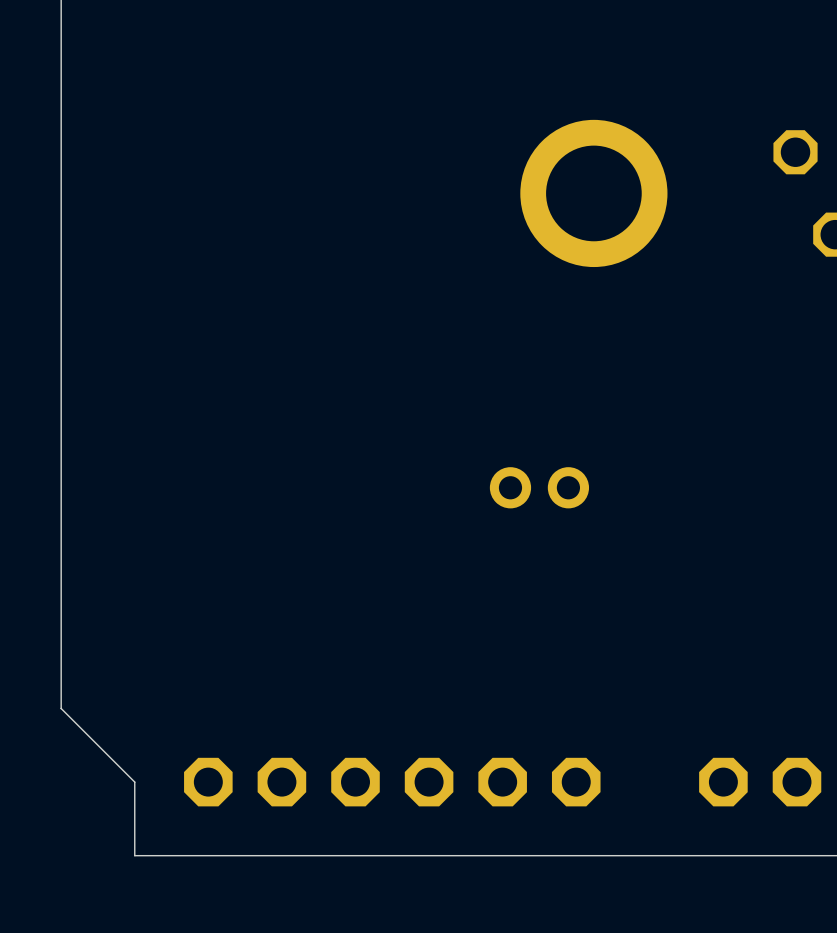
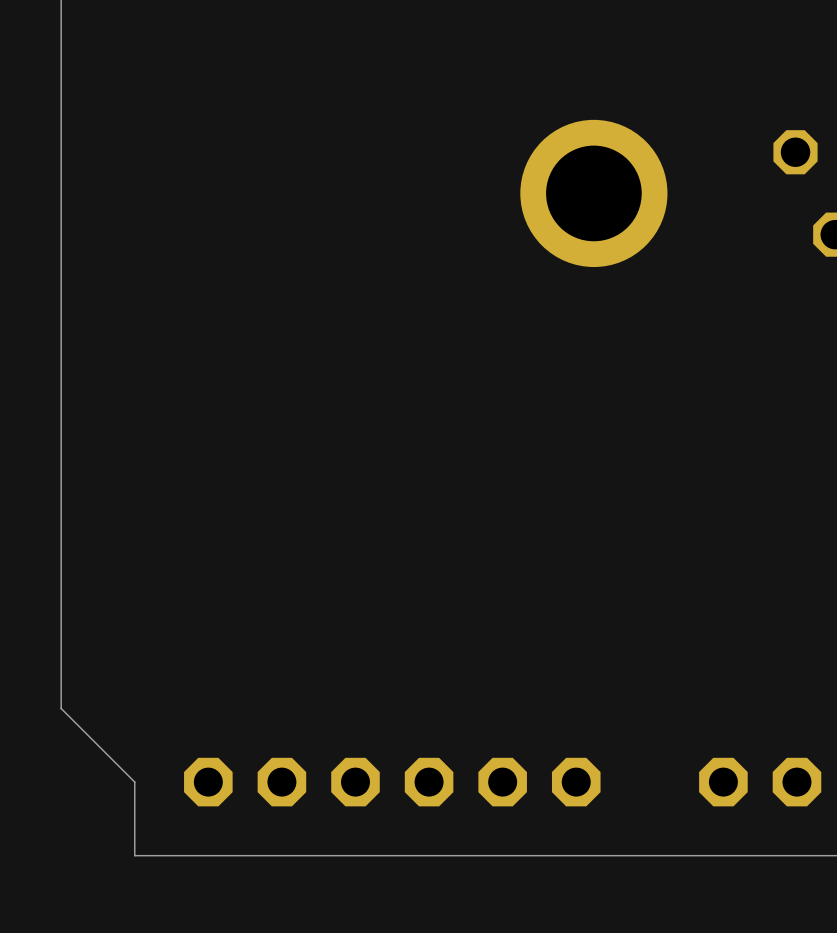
part: (539, 487) -> none

